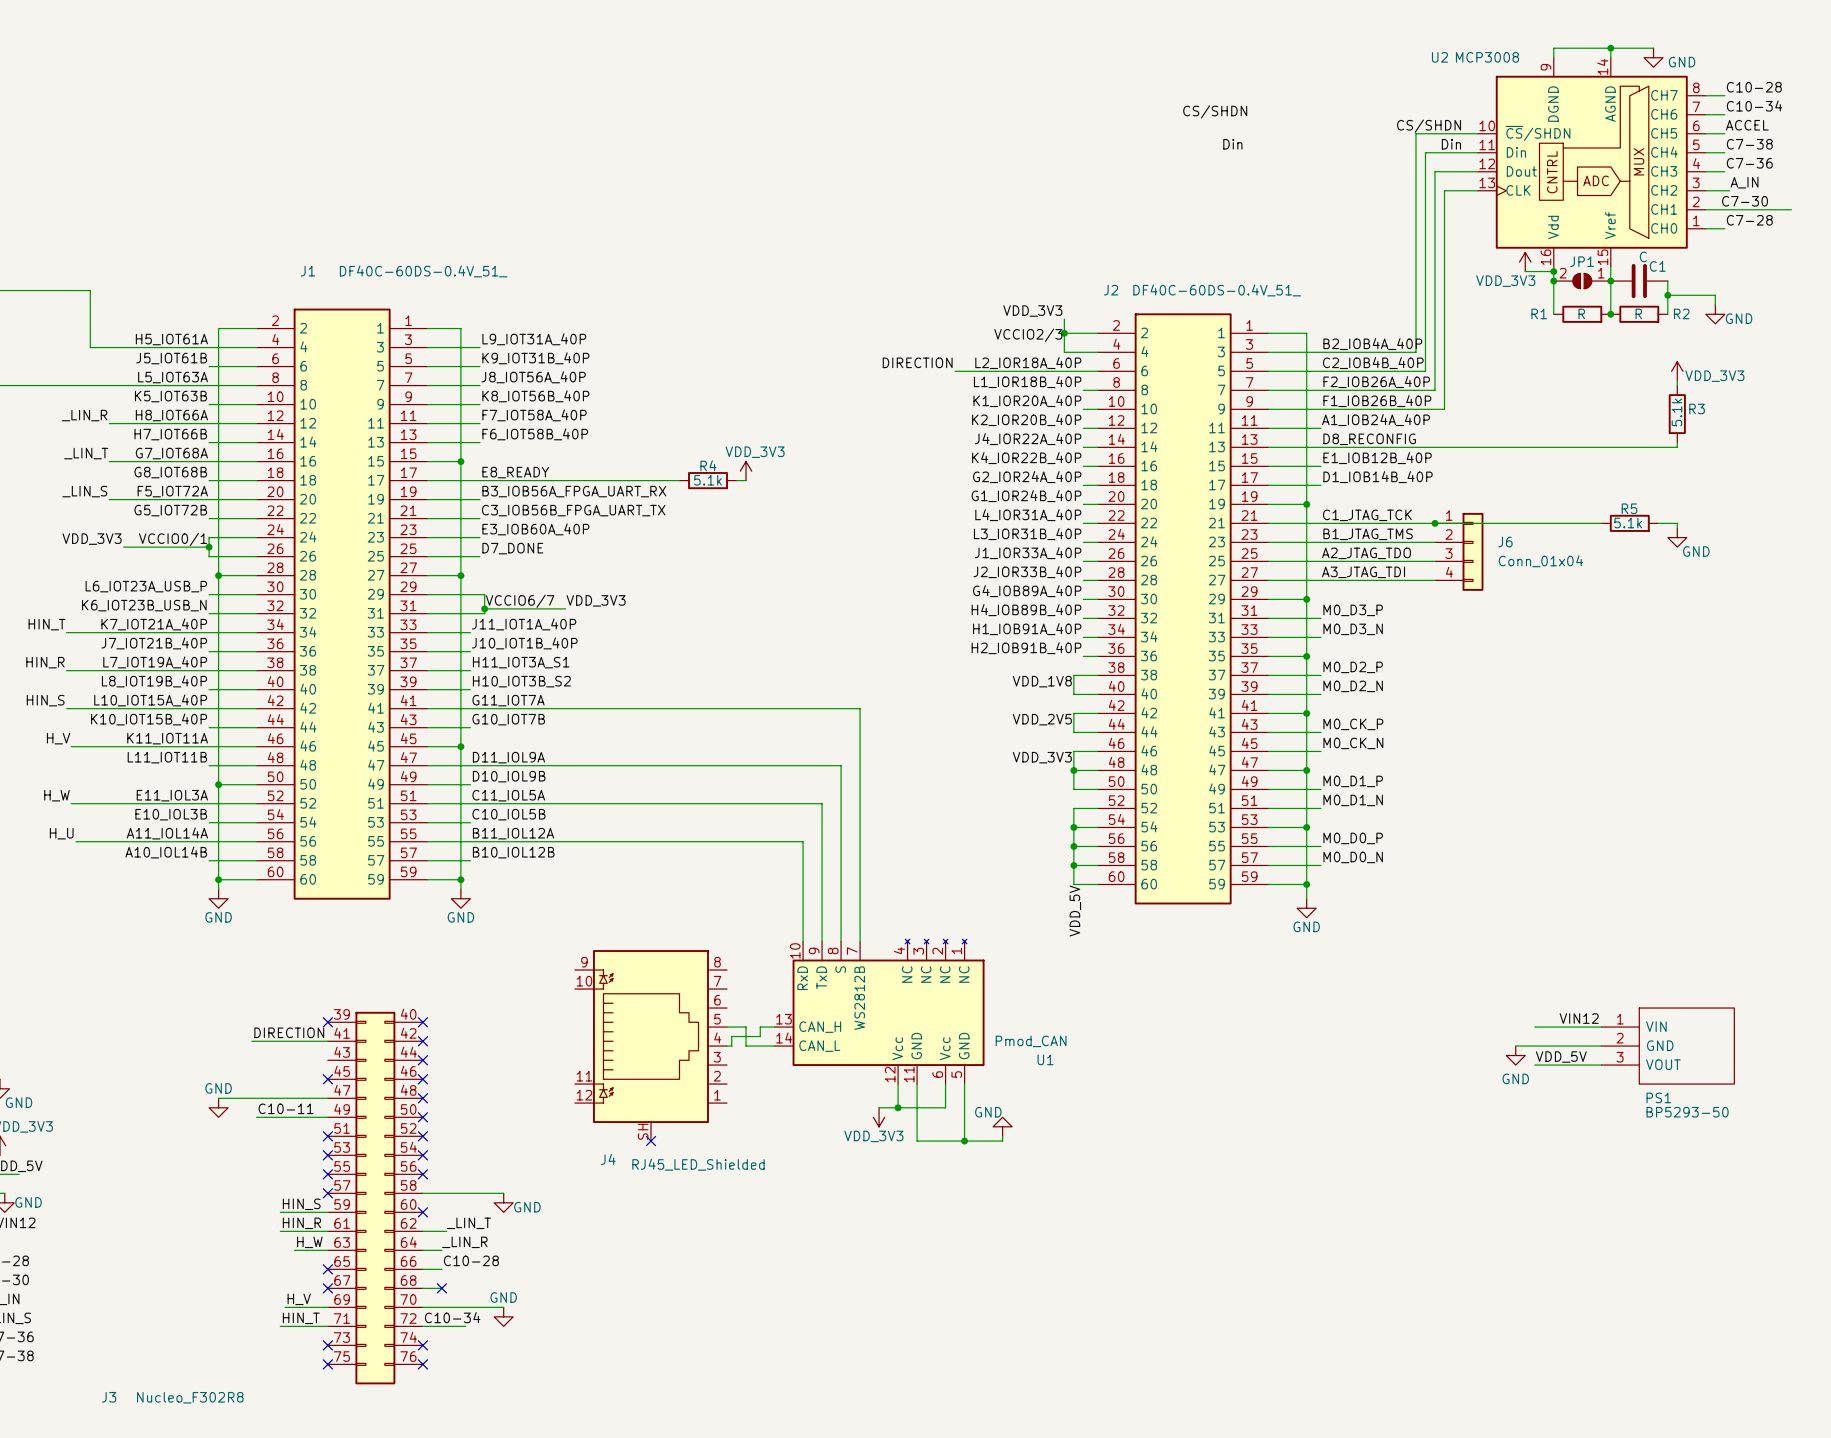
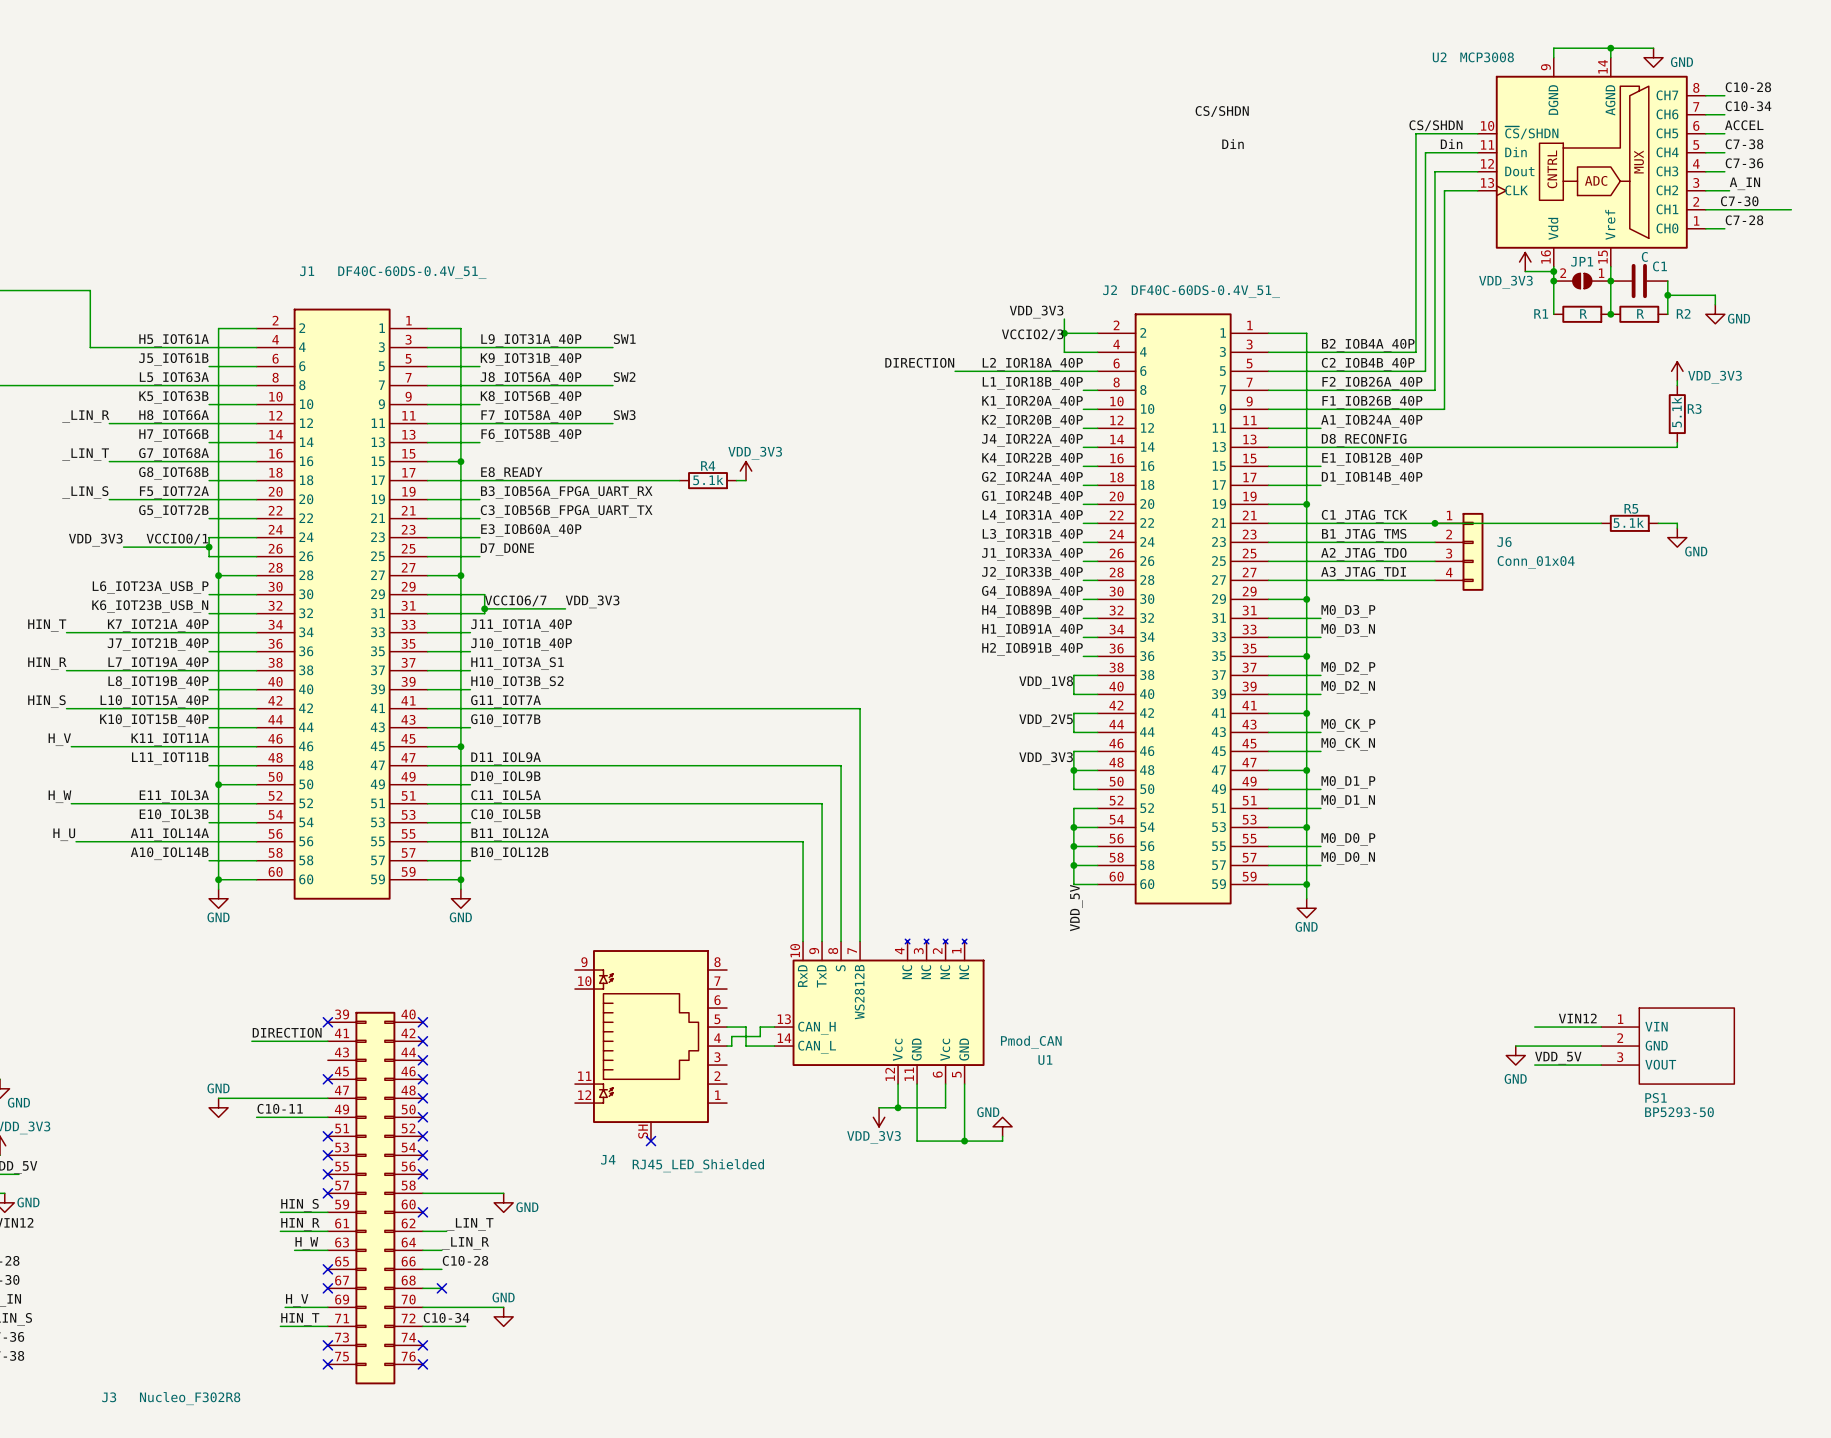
label: none -> SW1 (624, 339)
wire: none -> (479, 347) (612, 347)
label: none -> SW2 (624, 377)
wire: none -> (479, 385) (612, 385)
label: none -> SW3 (624, 415)
wire: none -> (479, 423) (612, 423)

